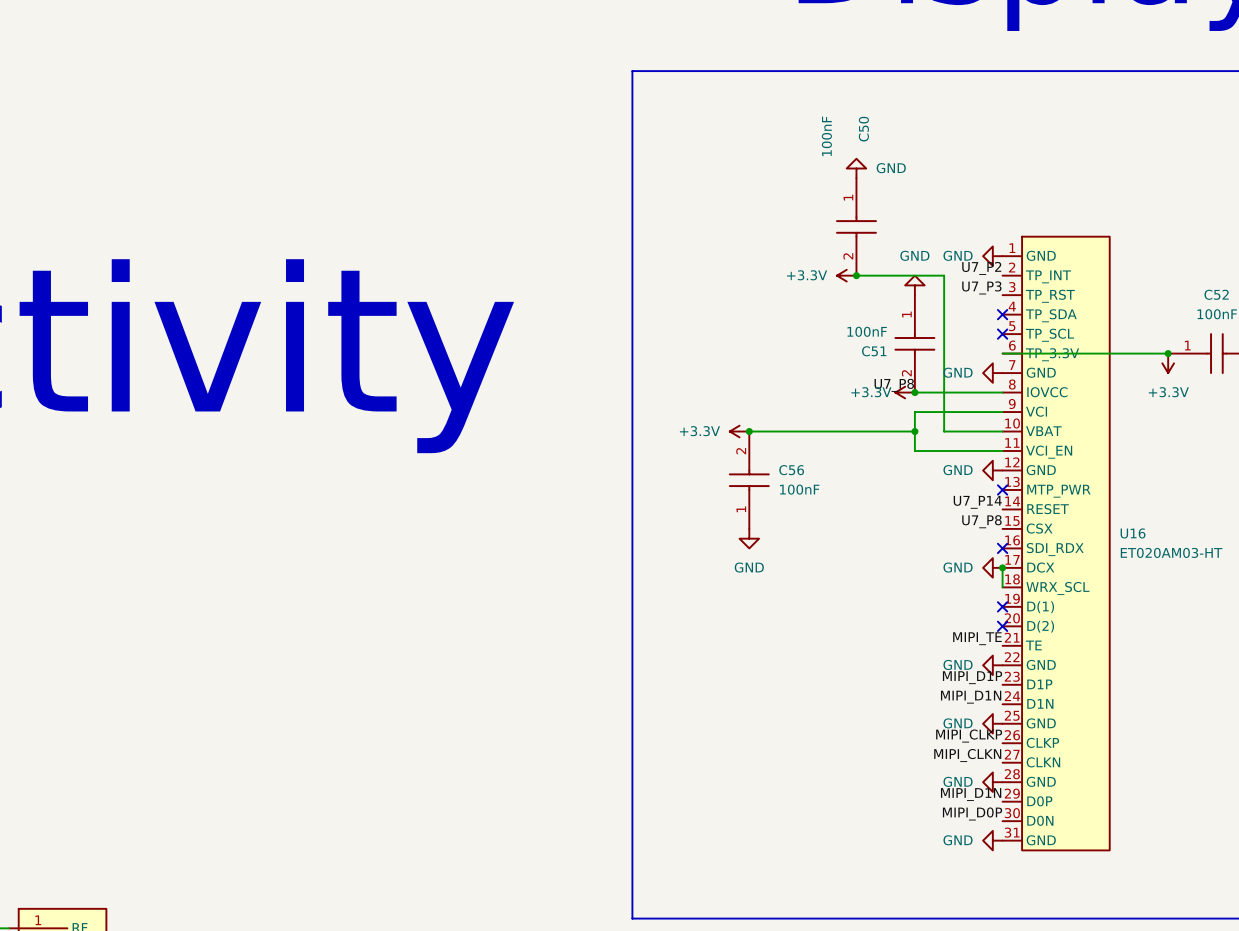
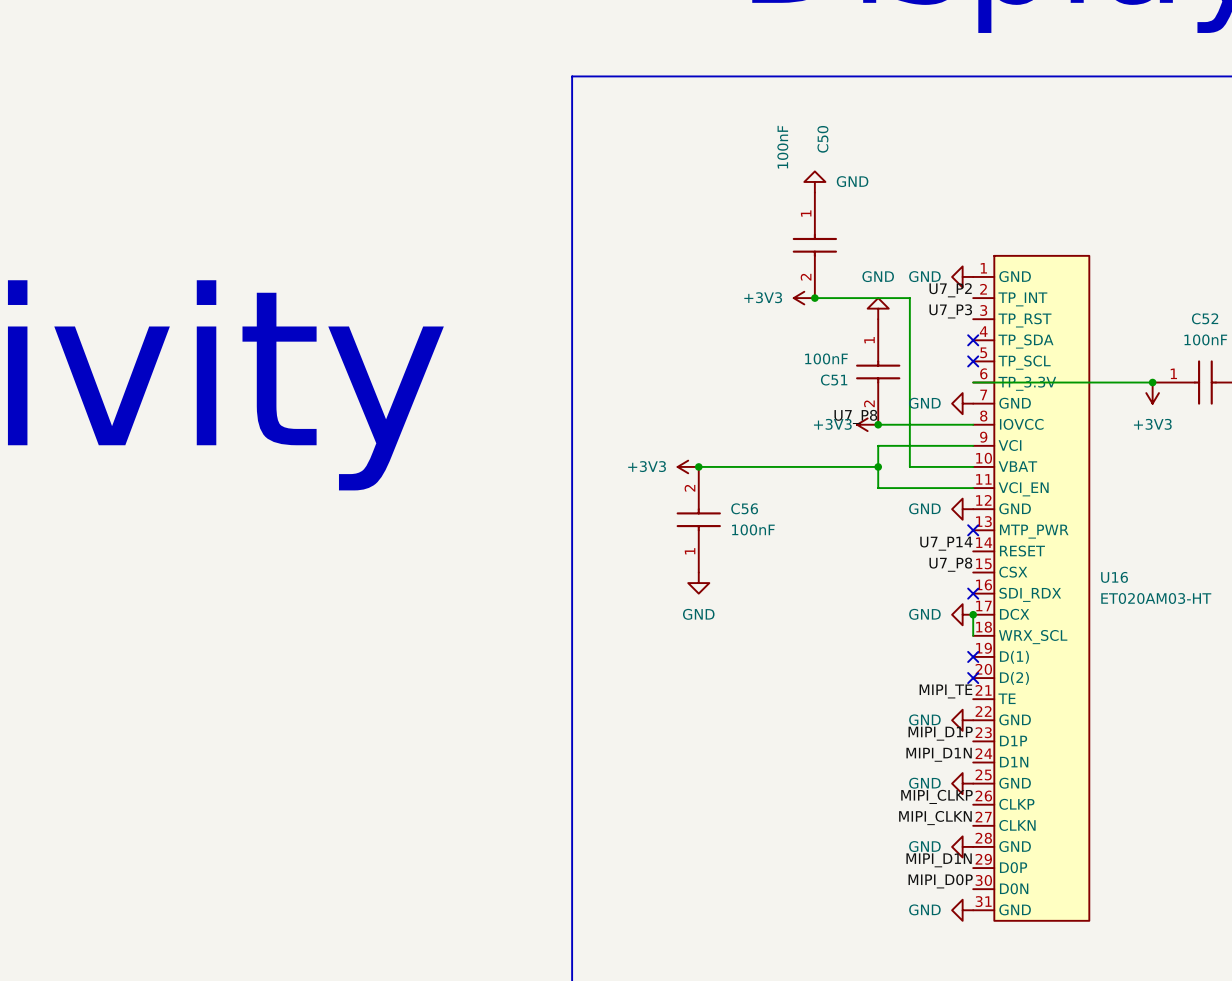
power symbol: +3.3V (846, 275) -> +3V3 (804, 298)
power symbol: +3.3V (1168, 363) -> +3V3 (1152, 393)
power symbol: +3.3V (905, 392) -> +3V3 (867, 424)
power symbol: +3.3V (739, 431) -> +3V3 (688, 466)

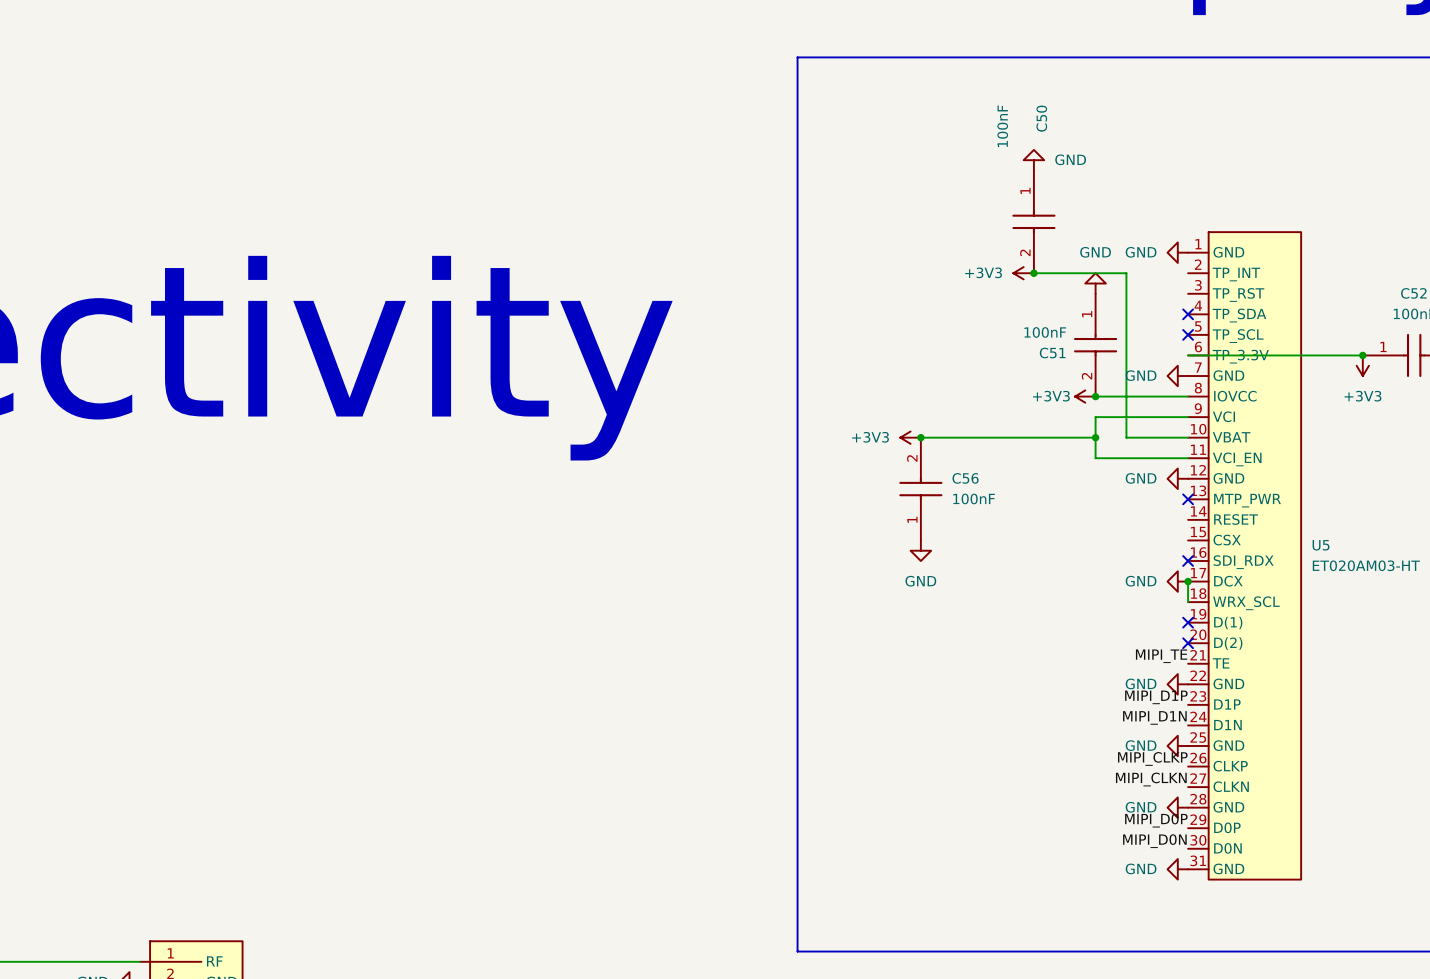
label: U7_P2 (950, 290) -> none
label: U7_P3 (950, 311) -> none
label: U7_P8 (855, 416) -> none
label: U7_P14 (946, 543) -> none
label: U7_P8 (950, 564) -> none
U16 name: U16 (1114, 577) -> U5 (1321, 545)
label: MIPI_D1N (939, 860) -> MIPI_D0P (1156, 820)
label: MIPI_D0P (940, 881) -> MIPI_D0N (1154, 841)

